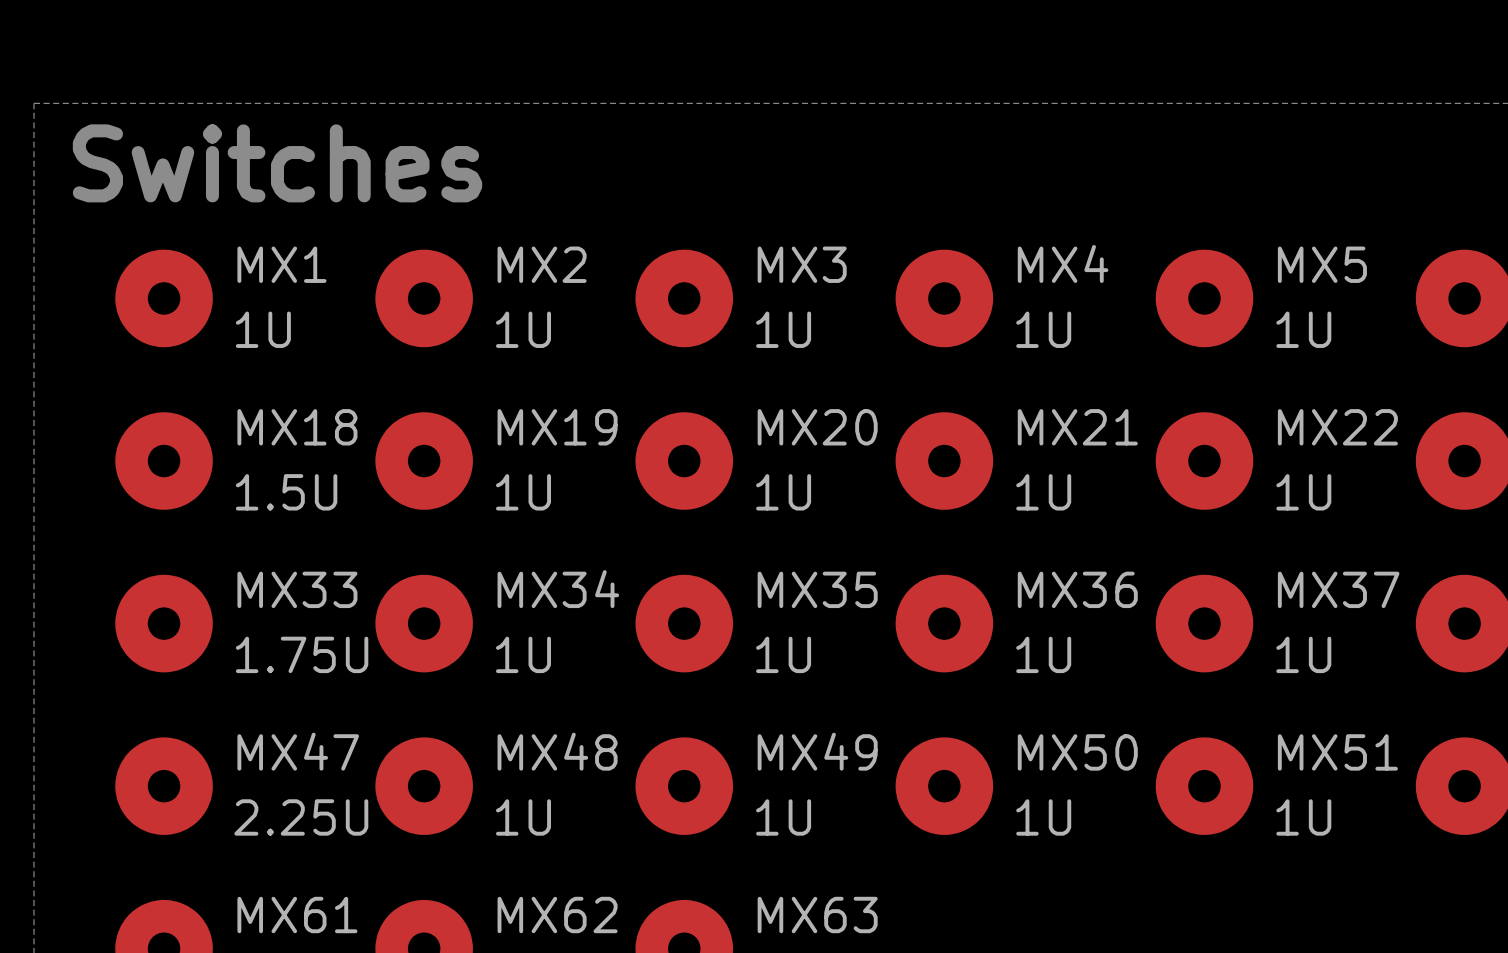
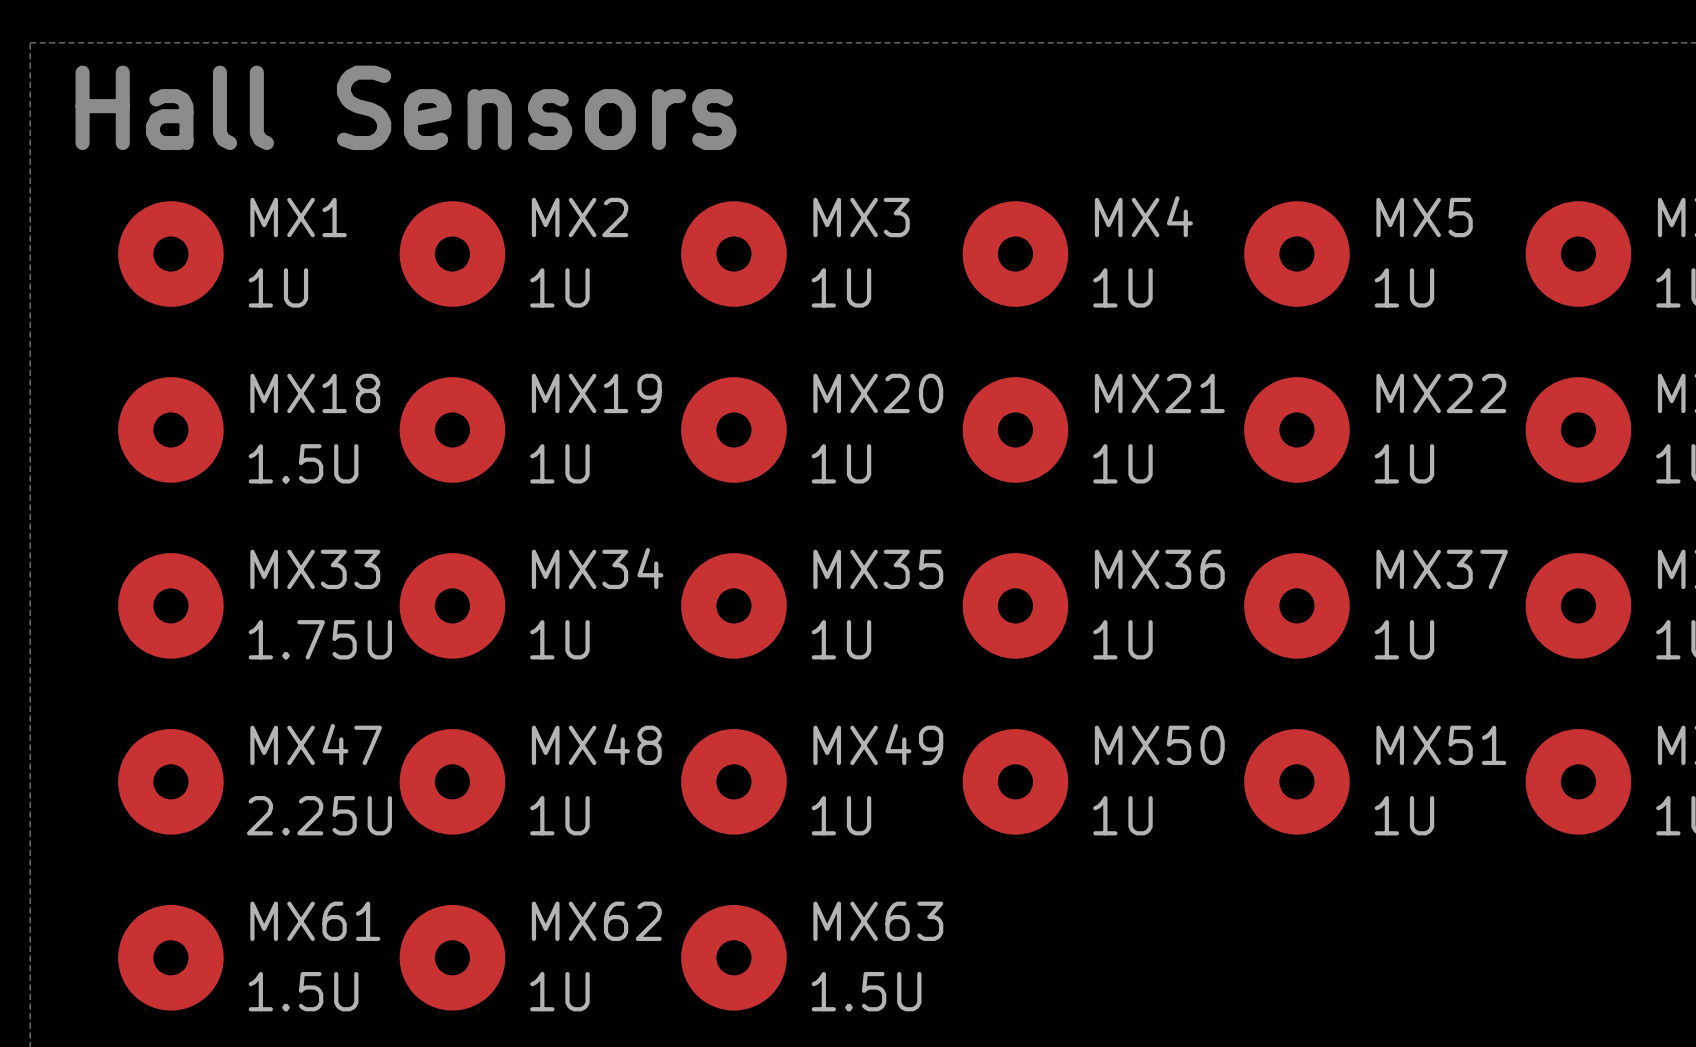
text: Switches (277, 163) -> Hall Sensors (405, 107)

